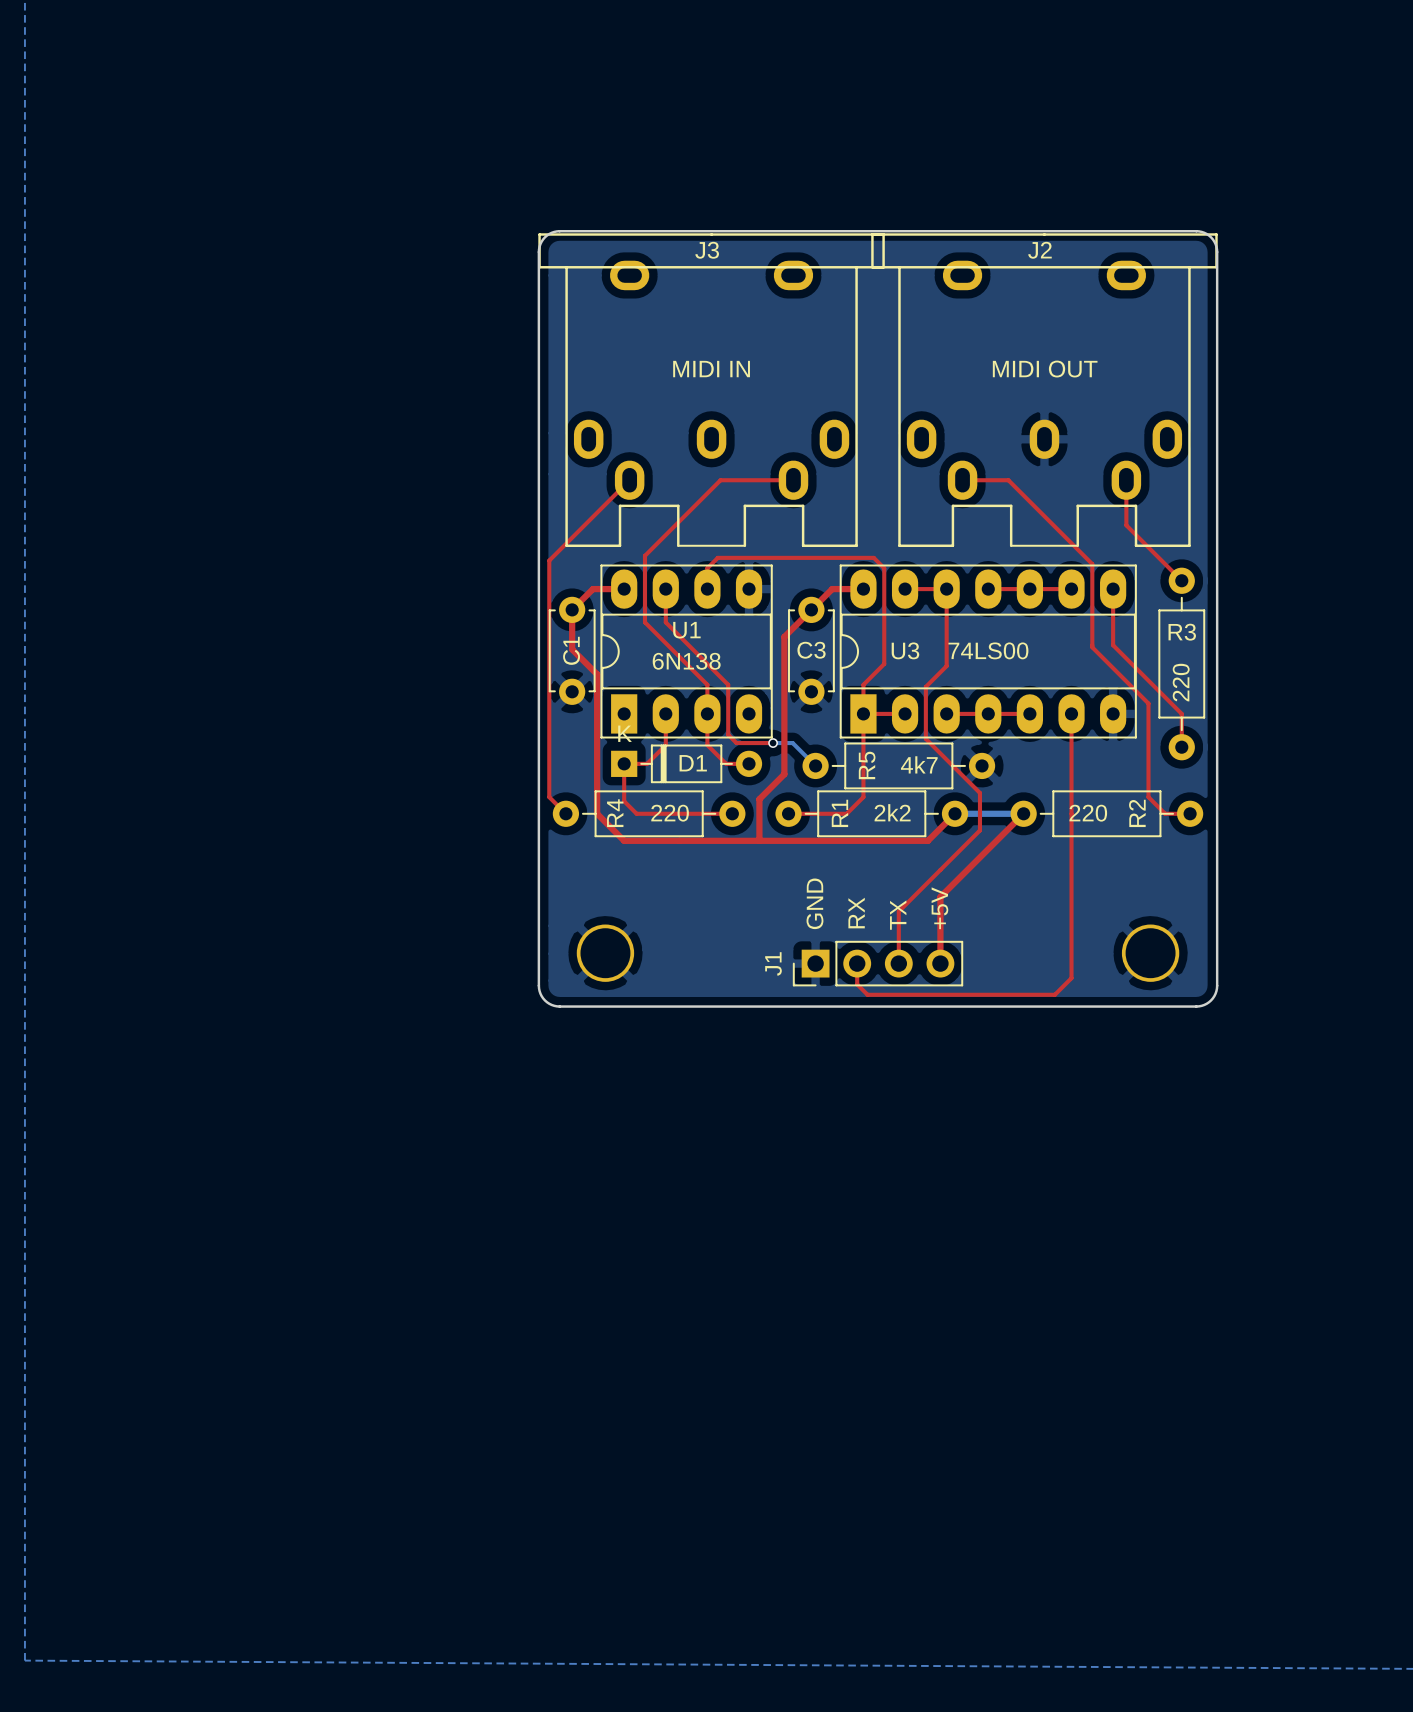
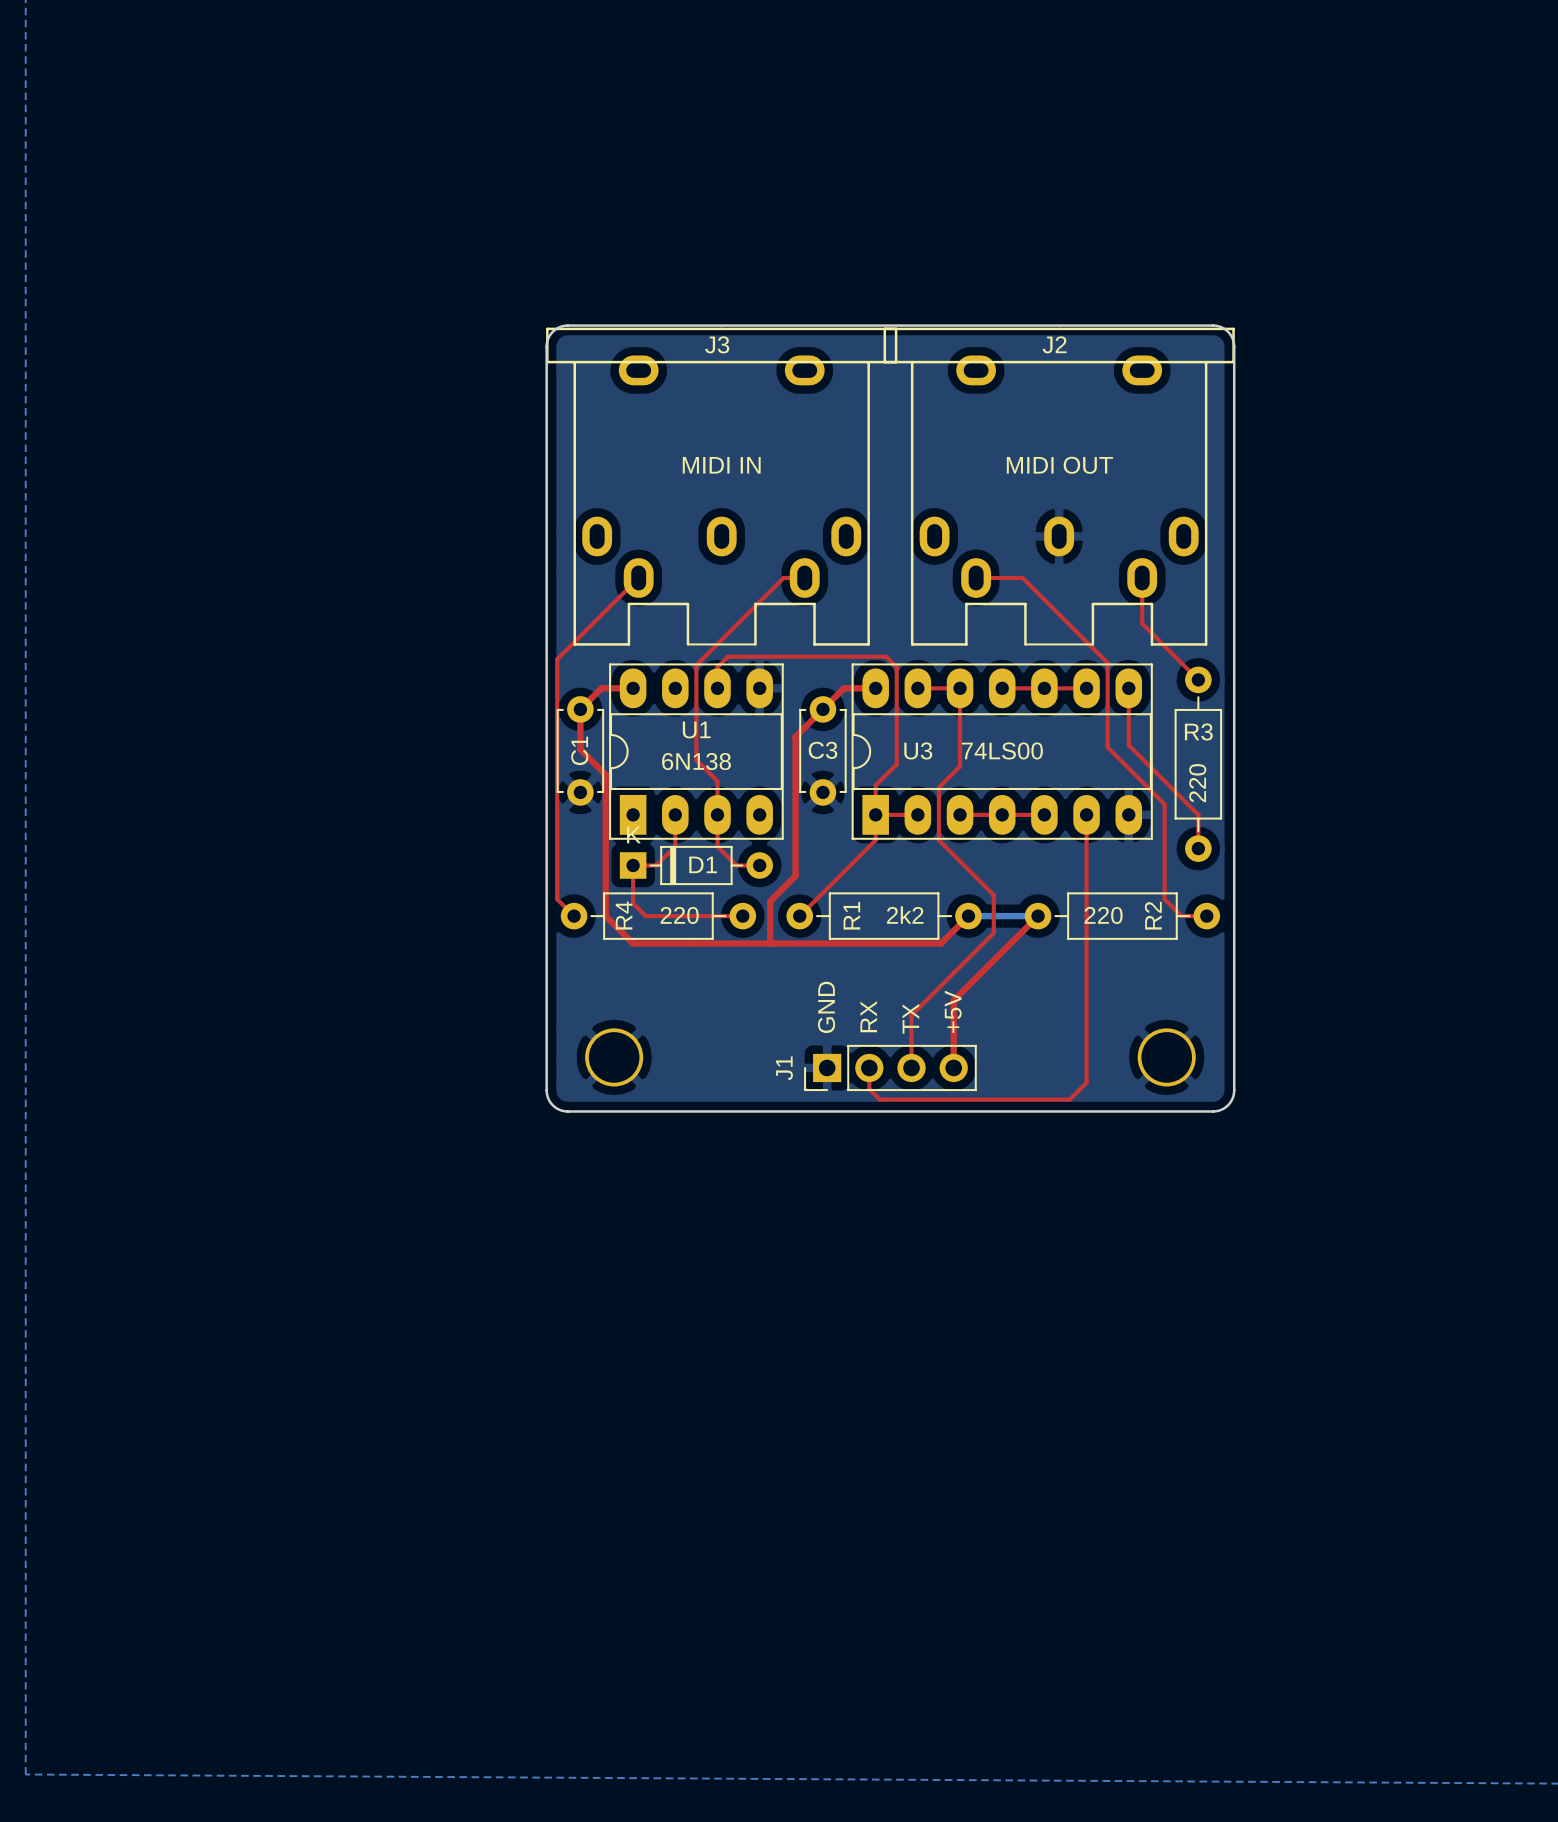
top track: (772, 480) (720, 480) (644, 555) (644, 622) (707, 684) -> (783, 577) (696, 665) (696, 760) (717, 781) (717, 785)
top track: (665, 589) (665, 622) (728, 684) (728, 734) (736, 743) (773, 743) -> none
top track: (863, 738) (863, 797) (846, 813) (788, 813) -> (875, 840) (799, 916)
bottom track: (773, 743) (792, 743) (815, 765) -> none
via: (773, 743) -> none
R5: 4k7 (898, 765) -> none

